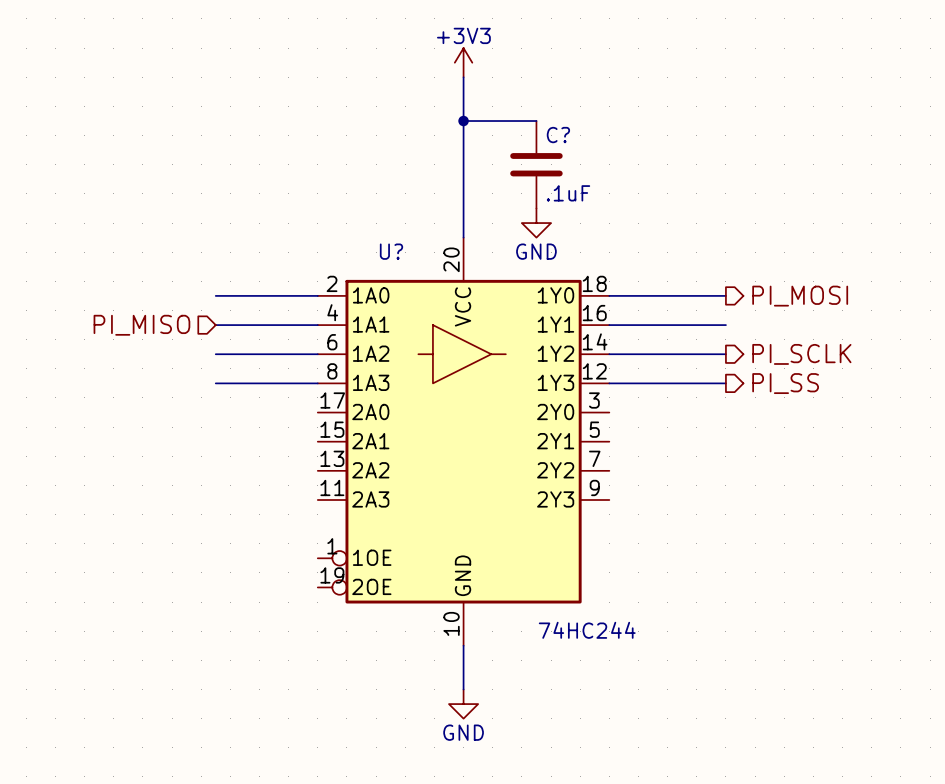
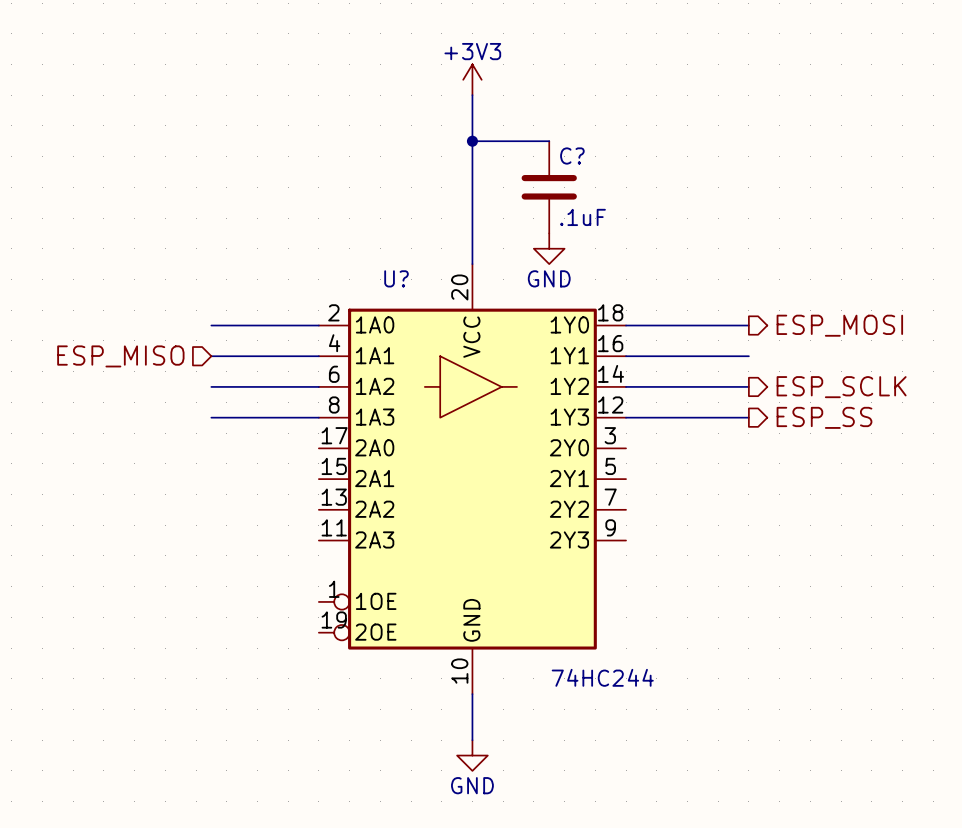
hierarchical label: PI_MOSI (800, 296) -> ESP_MOSI (839, 325)
hierarchical label: PI_MISO (141, 325) -> ESP_MISO (120, 356)
hierarchical label: PI_SCLK (801, 354) -> ESP_SCLK (841, 387)
hierarchical label: PI_SS (785, 383) -> ESP_SS (824, 417)

